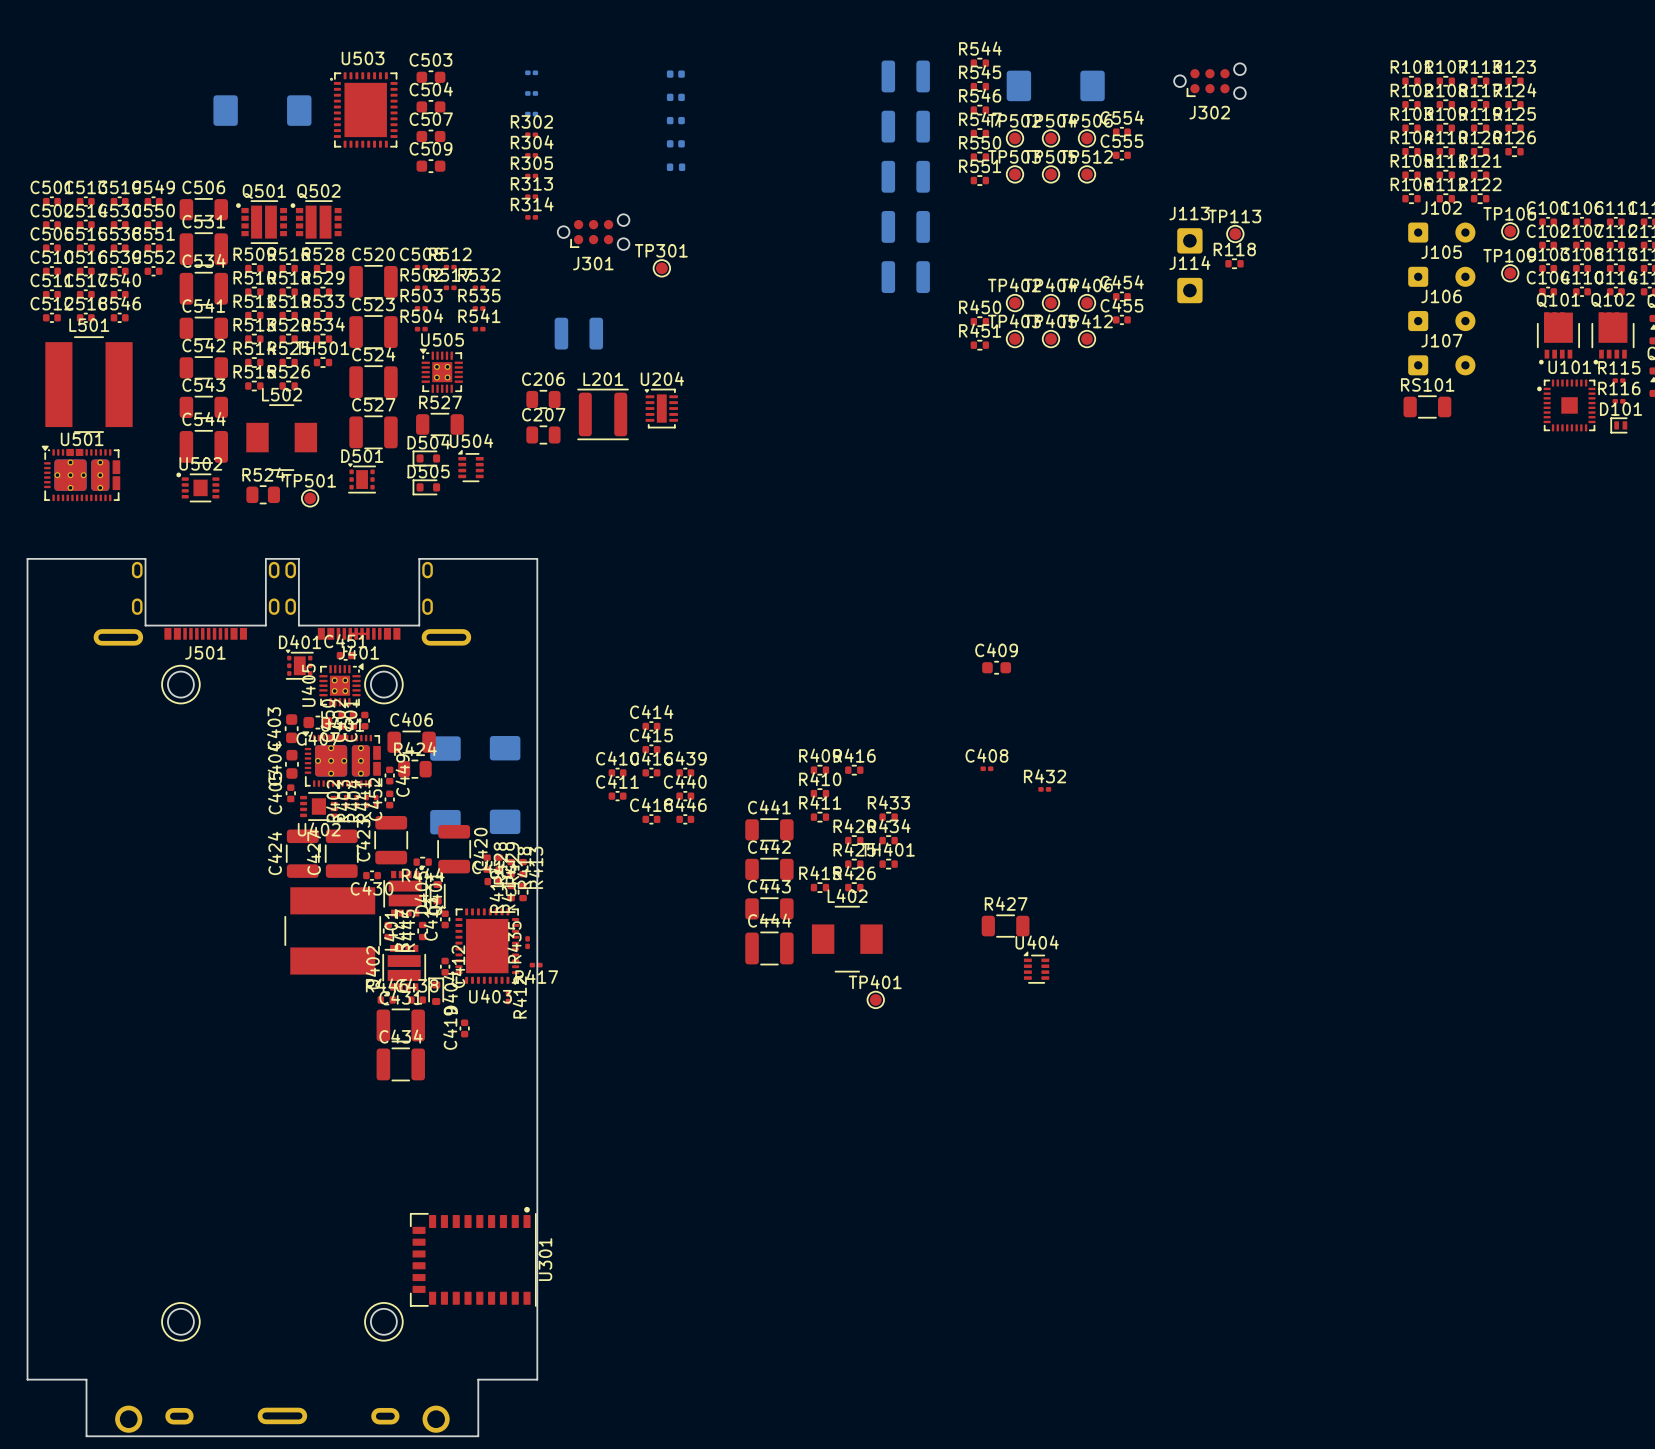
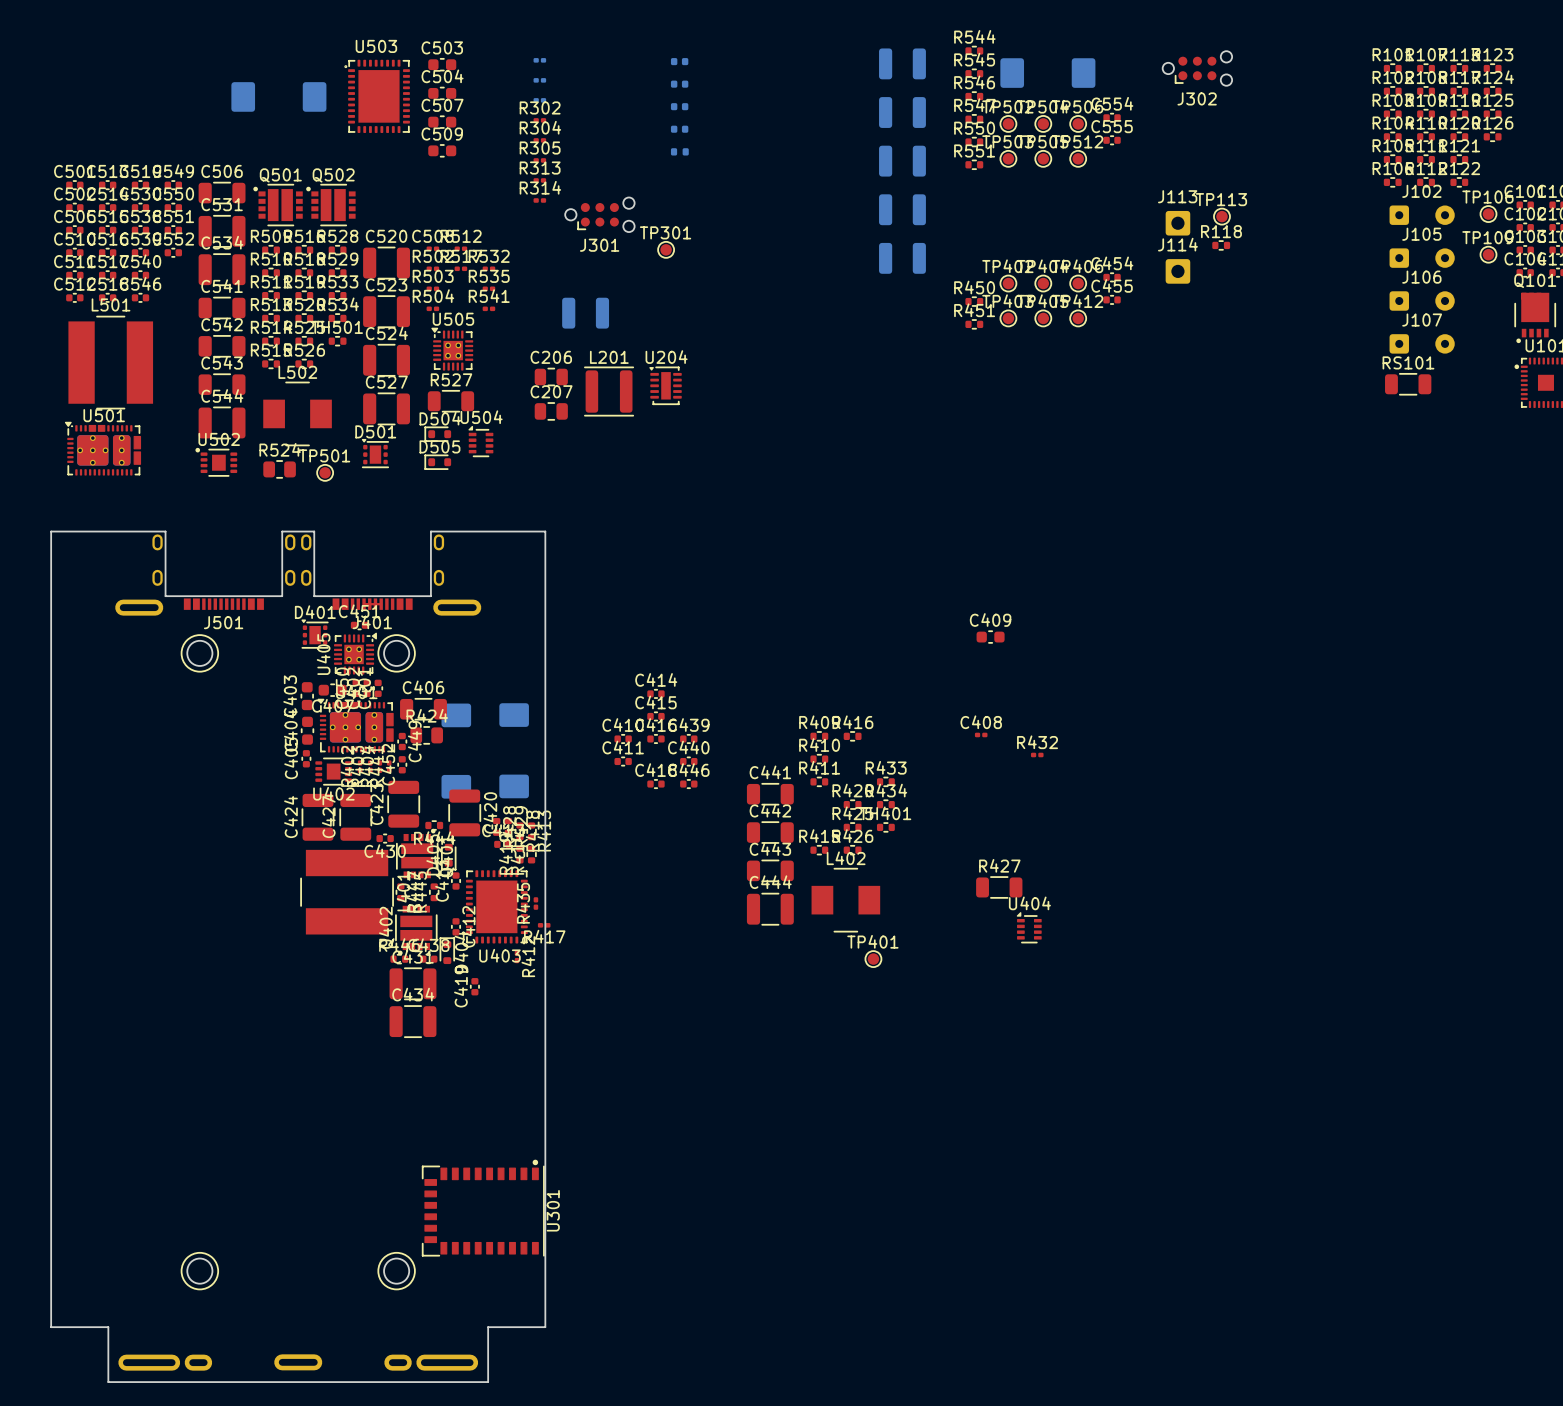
part footprint: [115, 1405, 143, 1433] -> [118, 1354, 181, 1371]
part footprint: [422, 1405, 450, 1433] -> [416, 1354, 479, 1371]

